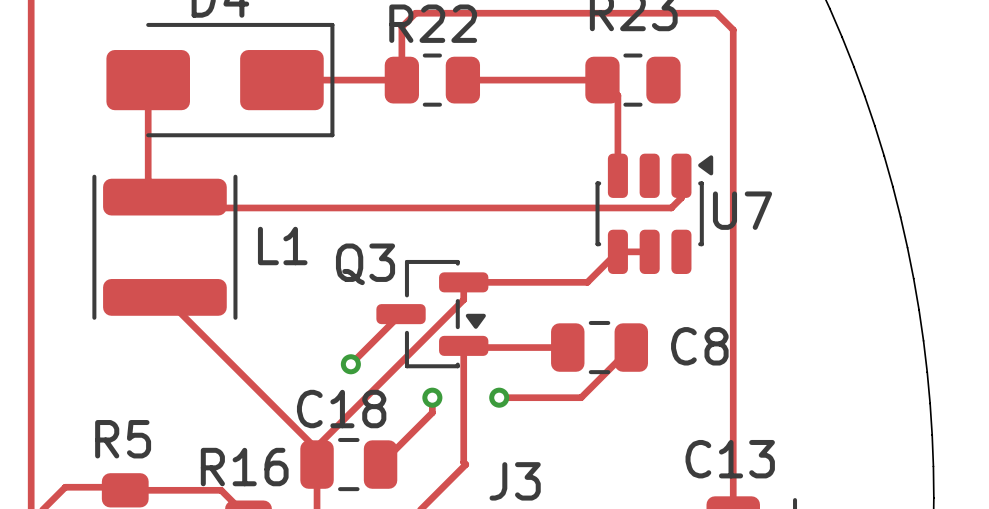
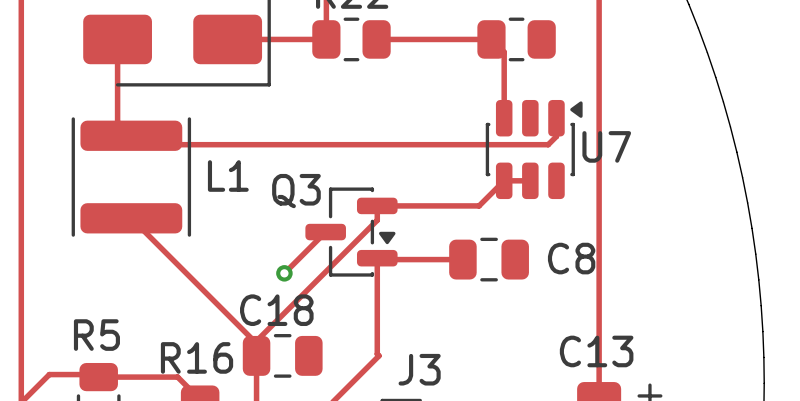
track: (631, 347) (581, 397) (499, 397) -> none
track: (432, 397) (432, 412) (380, 464) -> none
via: (432, 397) -> none
via: (499, 397) -> none

